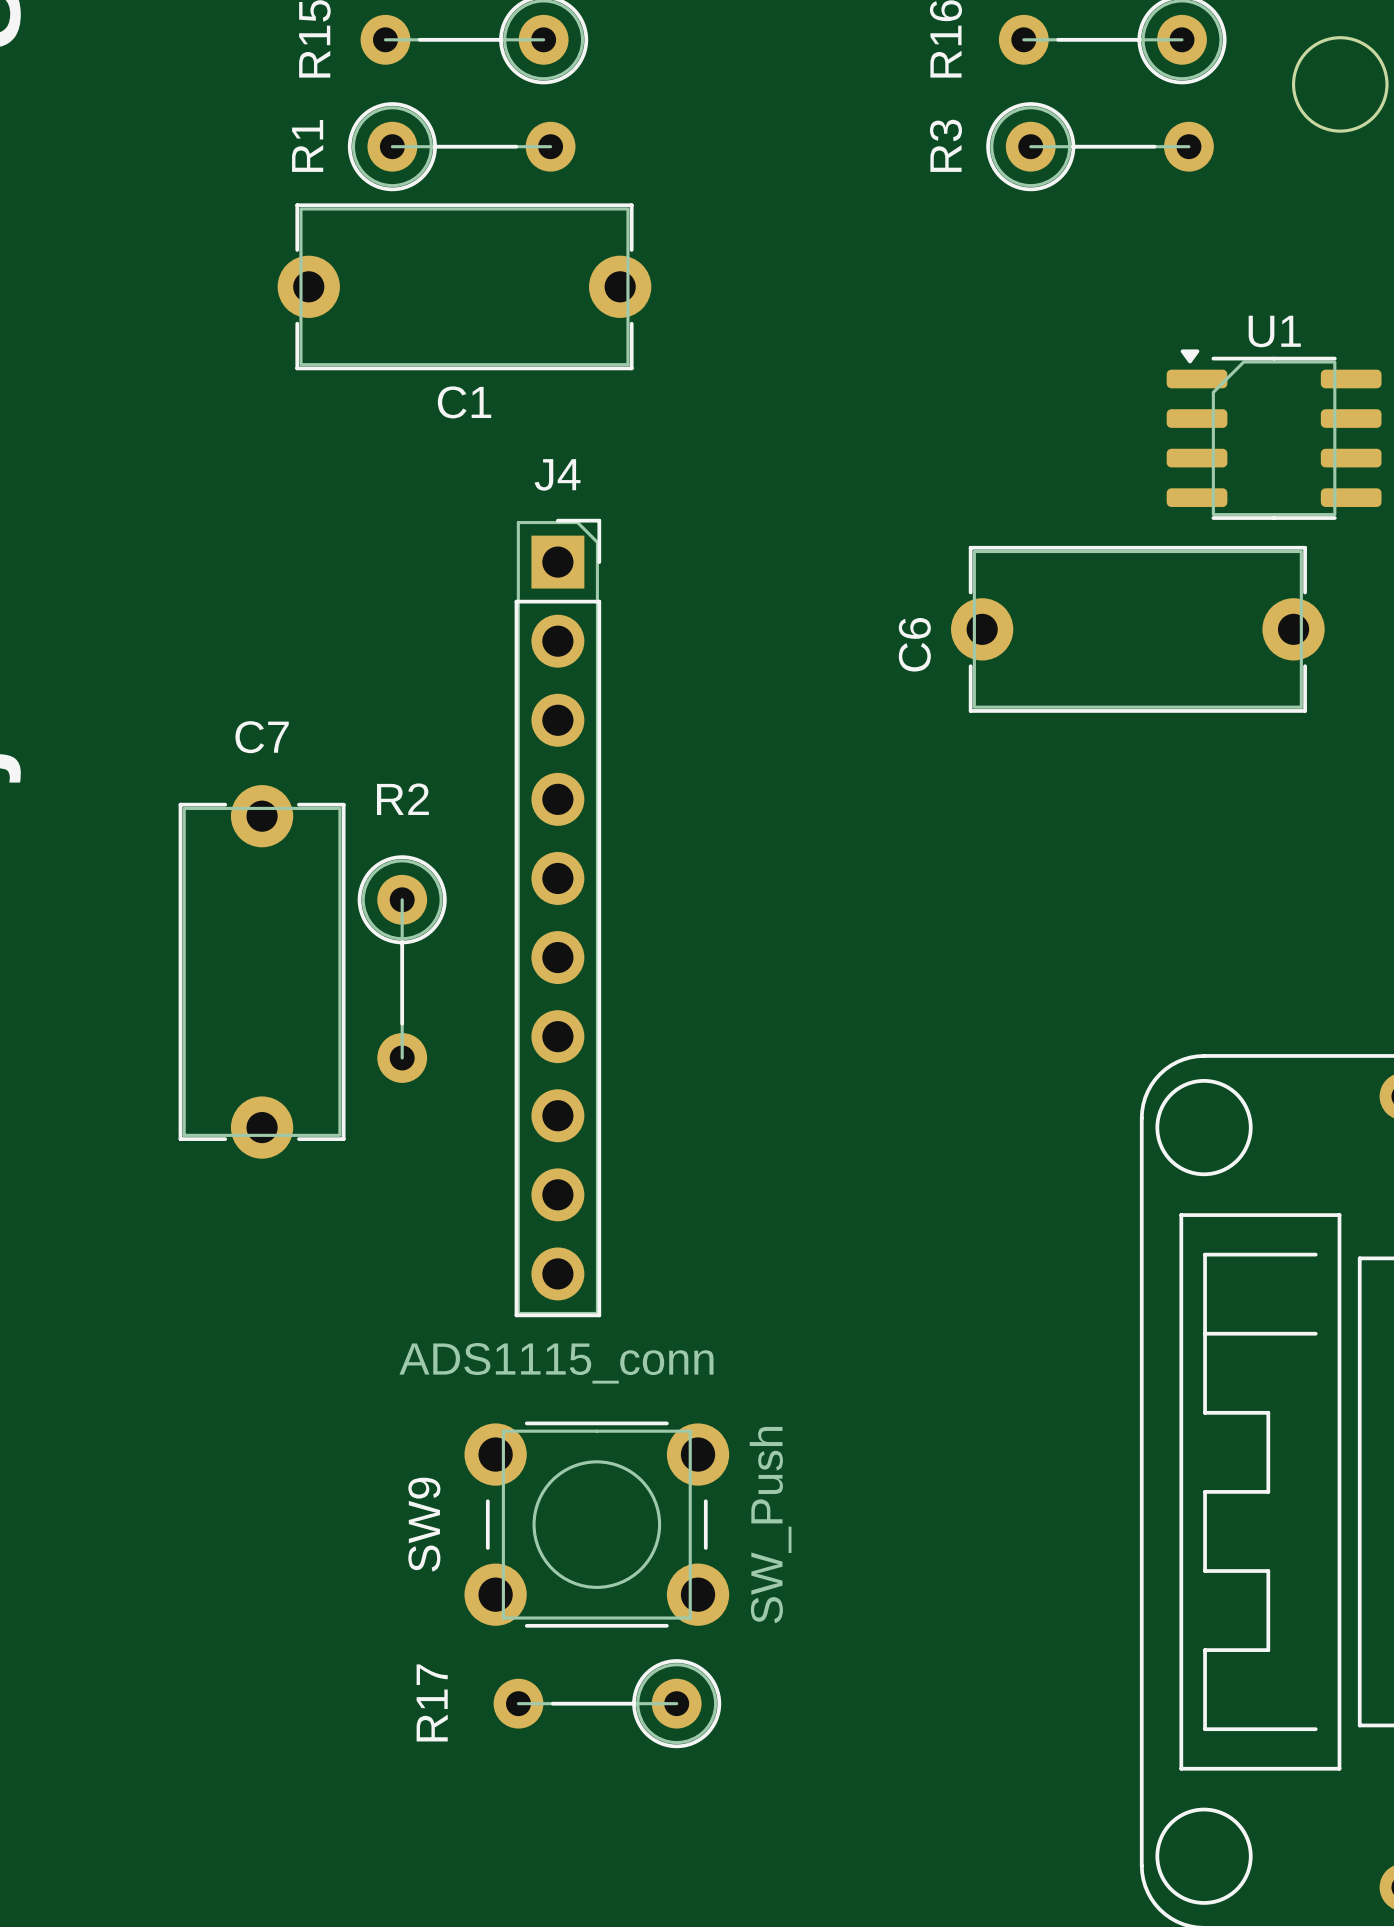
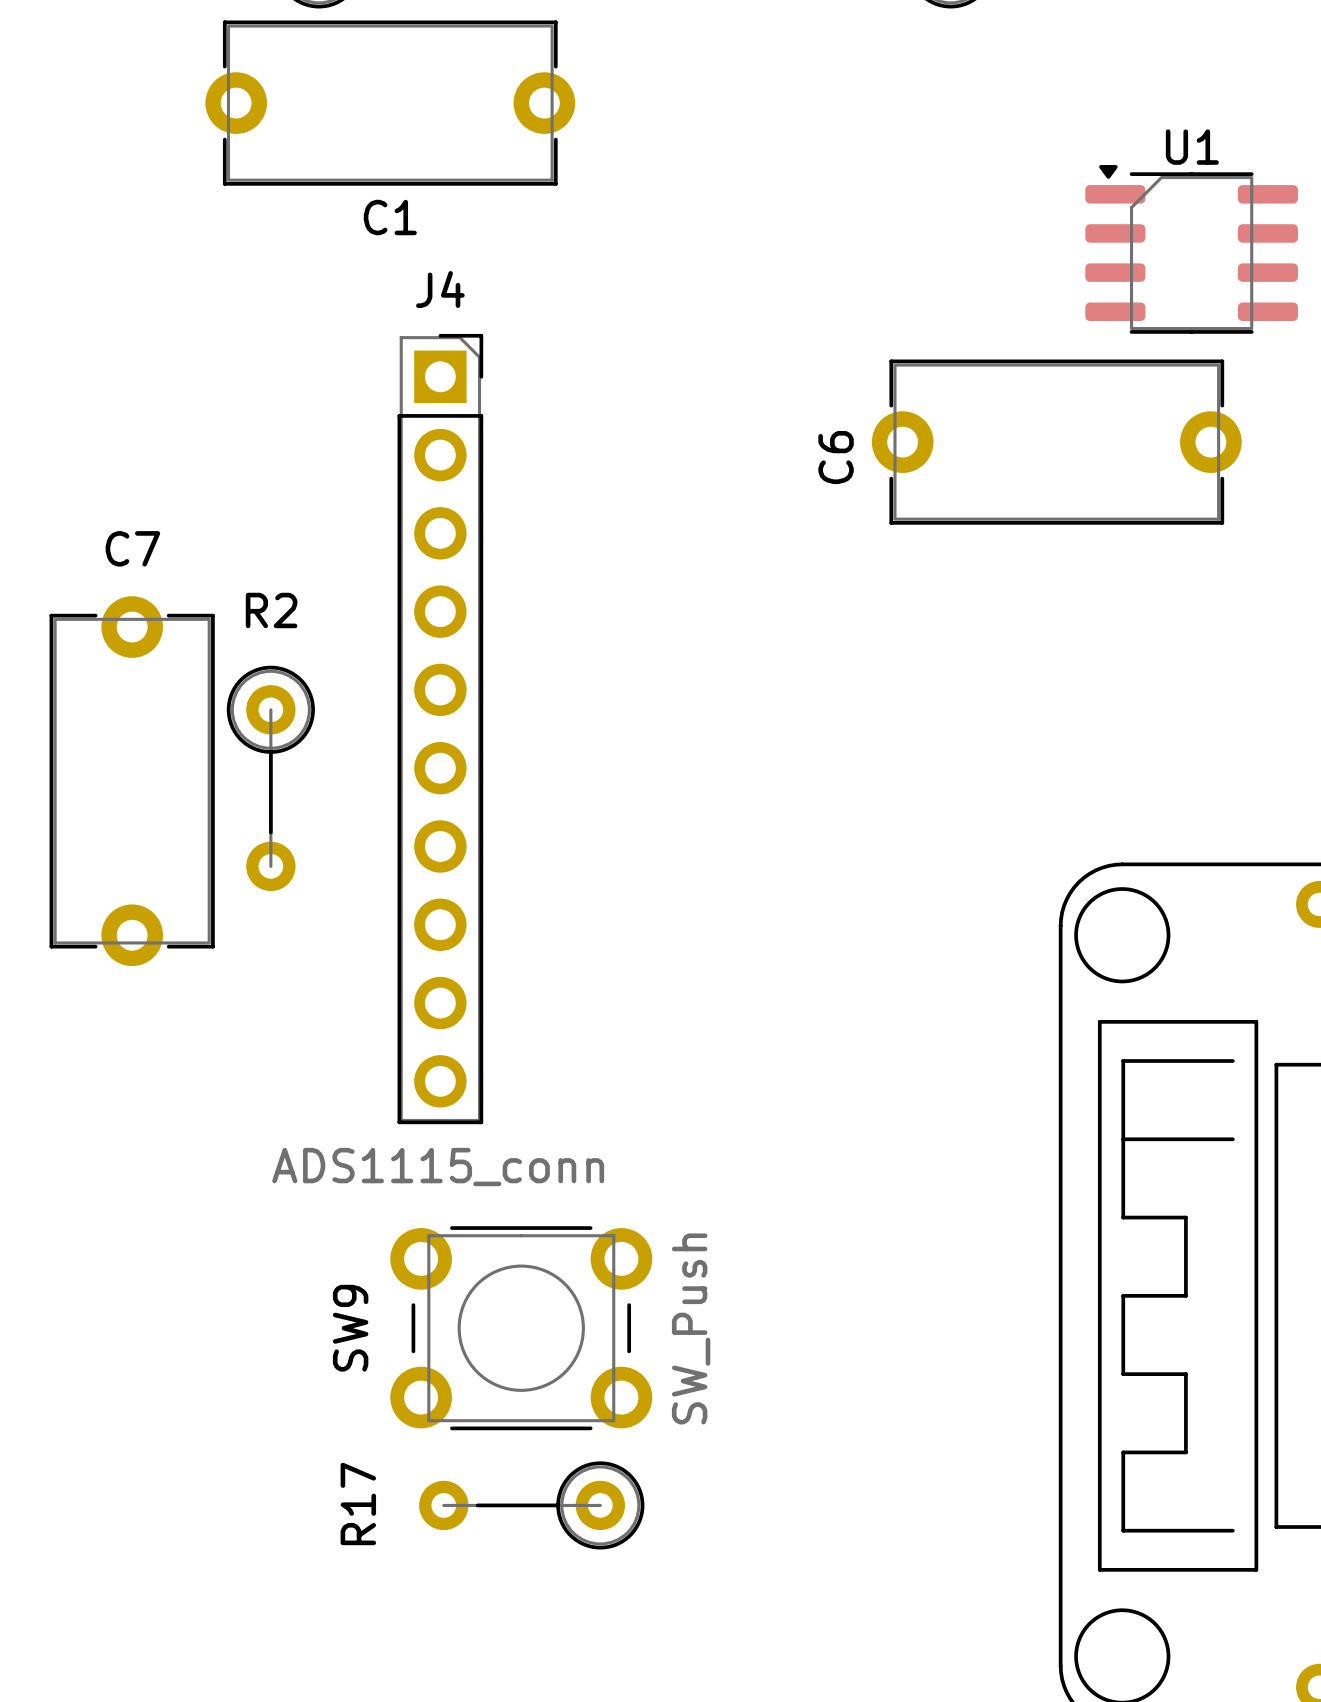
J4 position: (557, 918) -> (440, 729)
R2 position: (402, 969) -> (270, 778)
C7 position: (262, 971) -> (132, 781)

